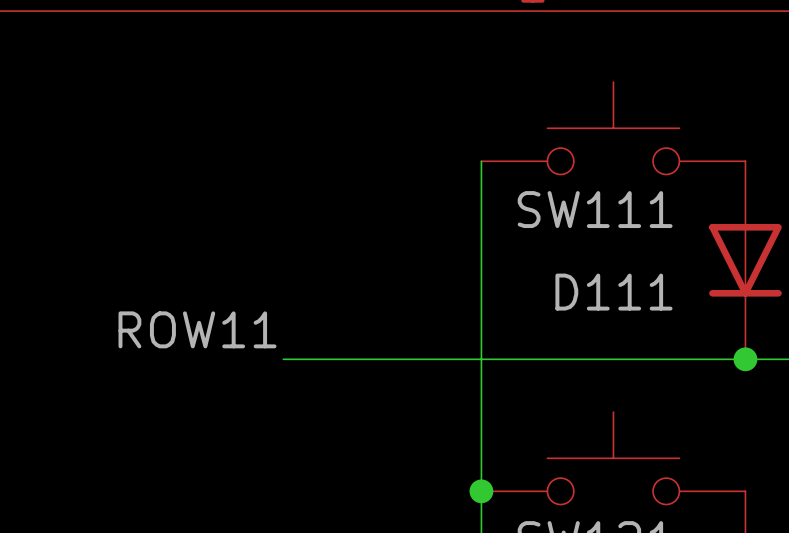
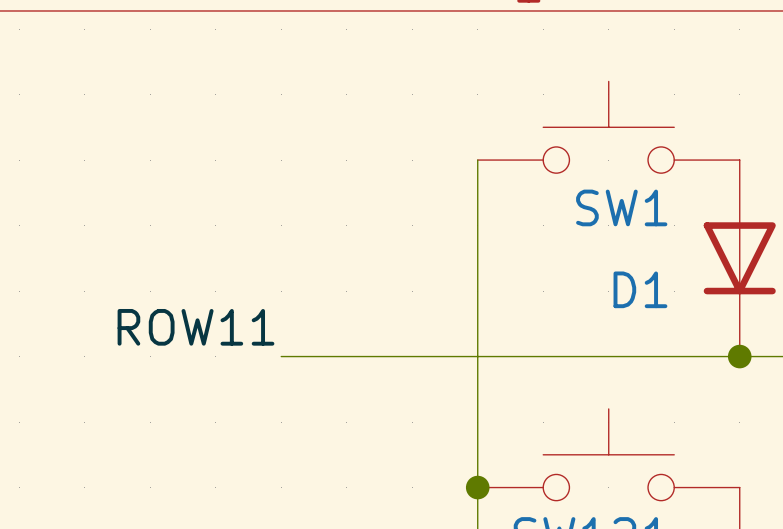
SW111 name: SW111 (595, 209) -> SW1 (621, 207)
D111 name: D111 (613, 292) -> D1 (640, 289)

